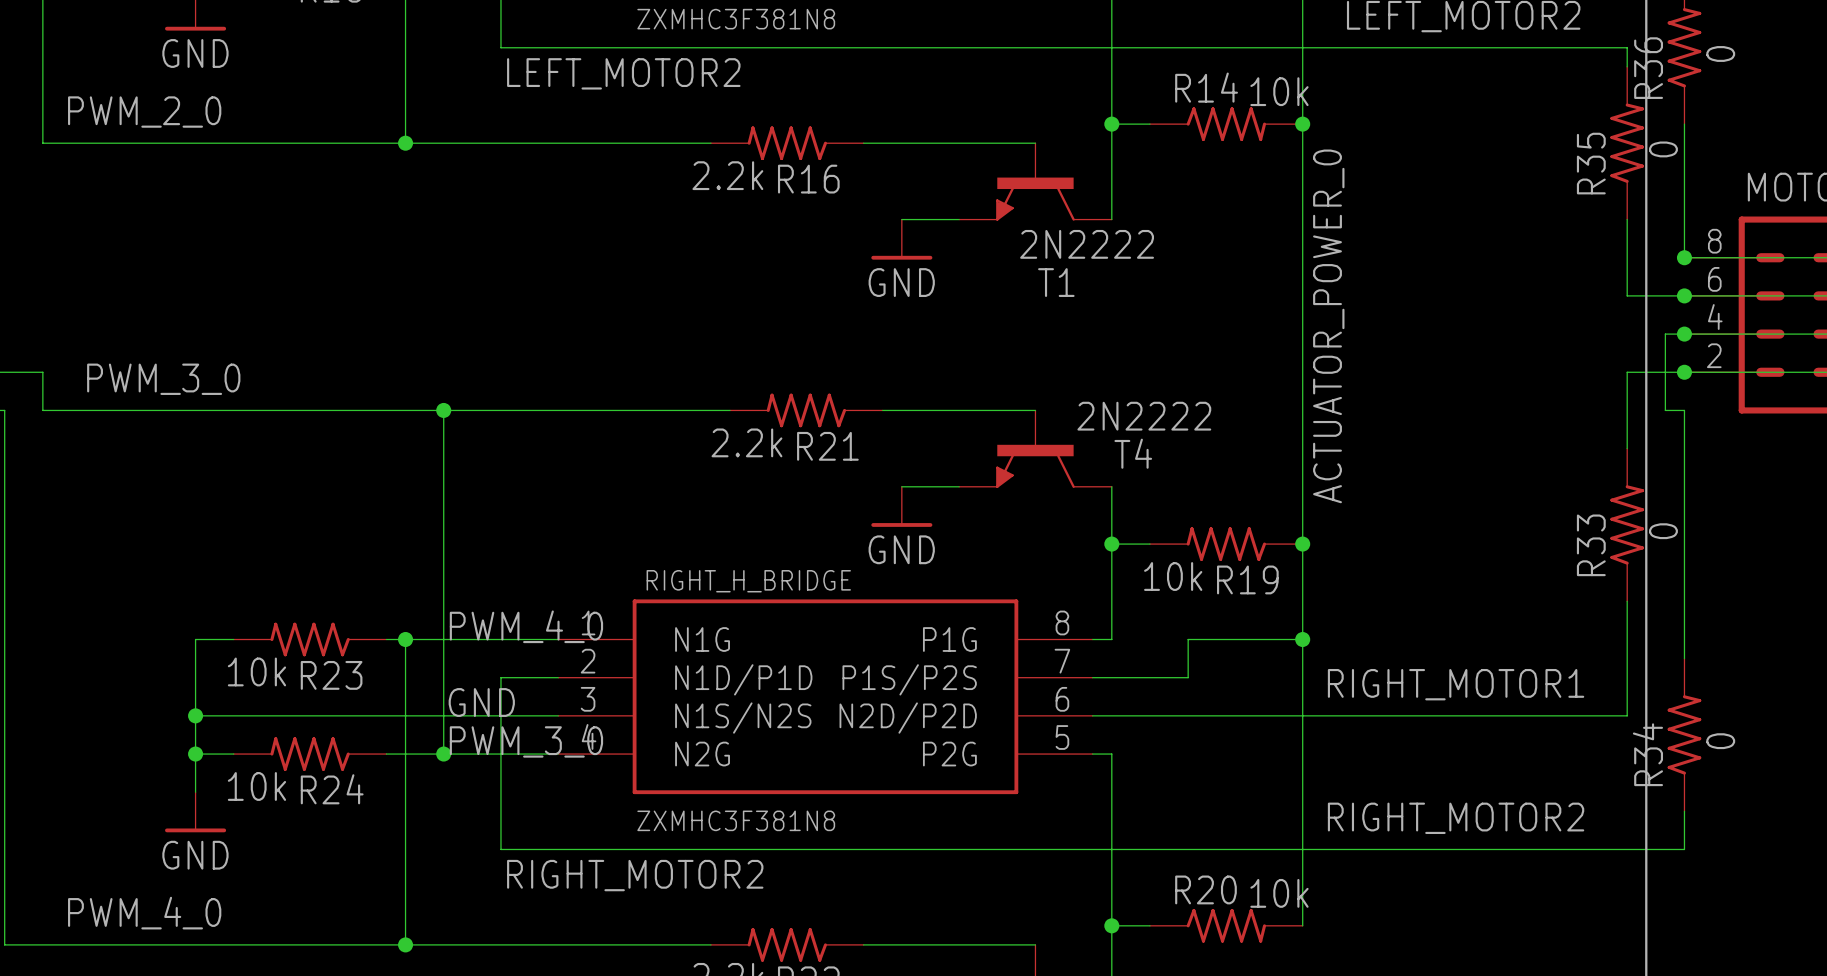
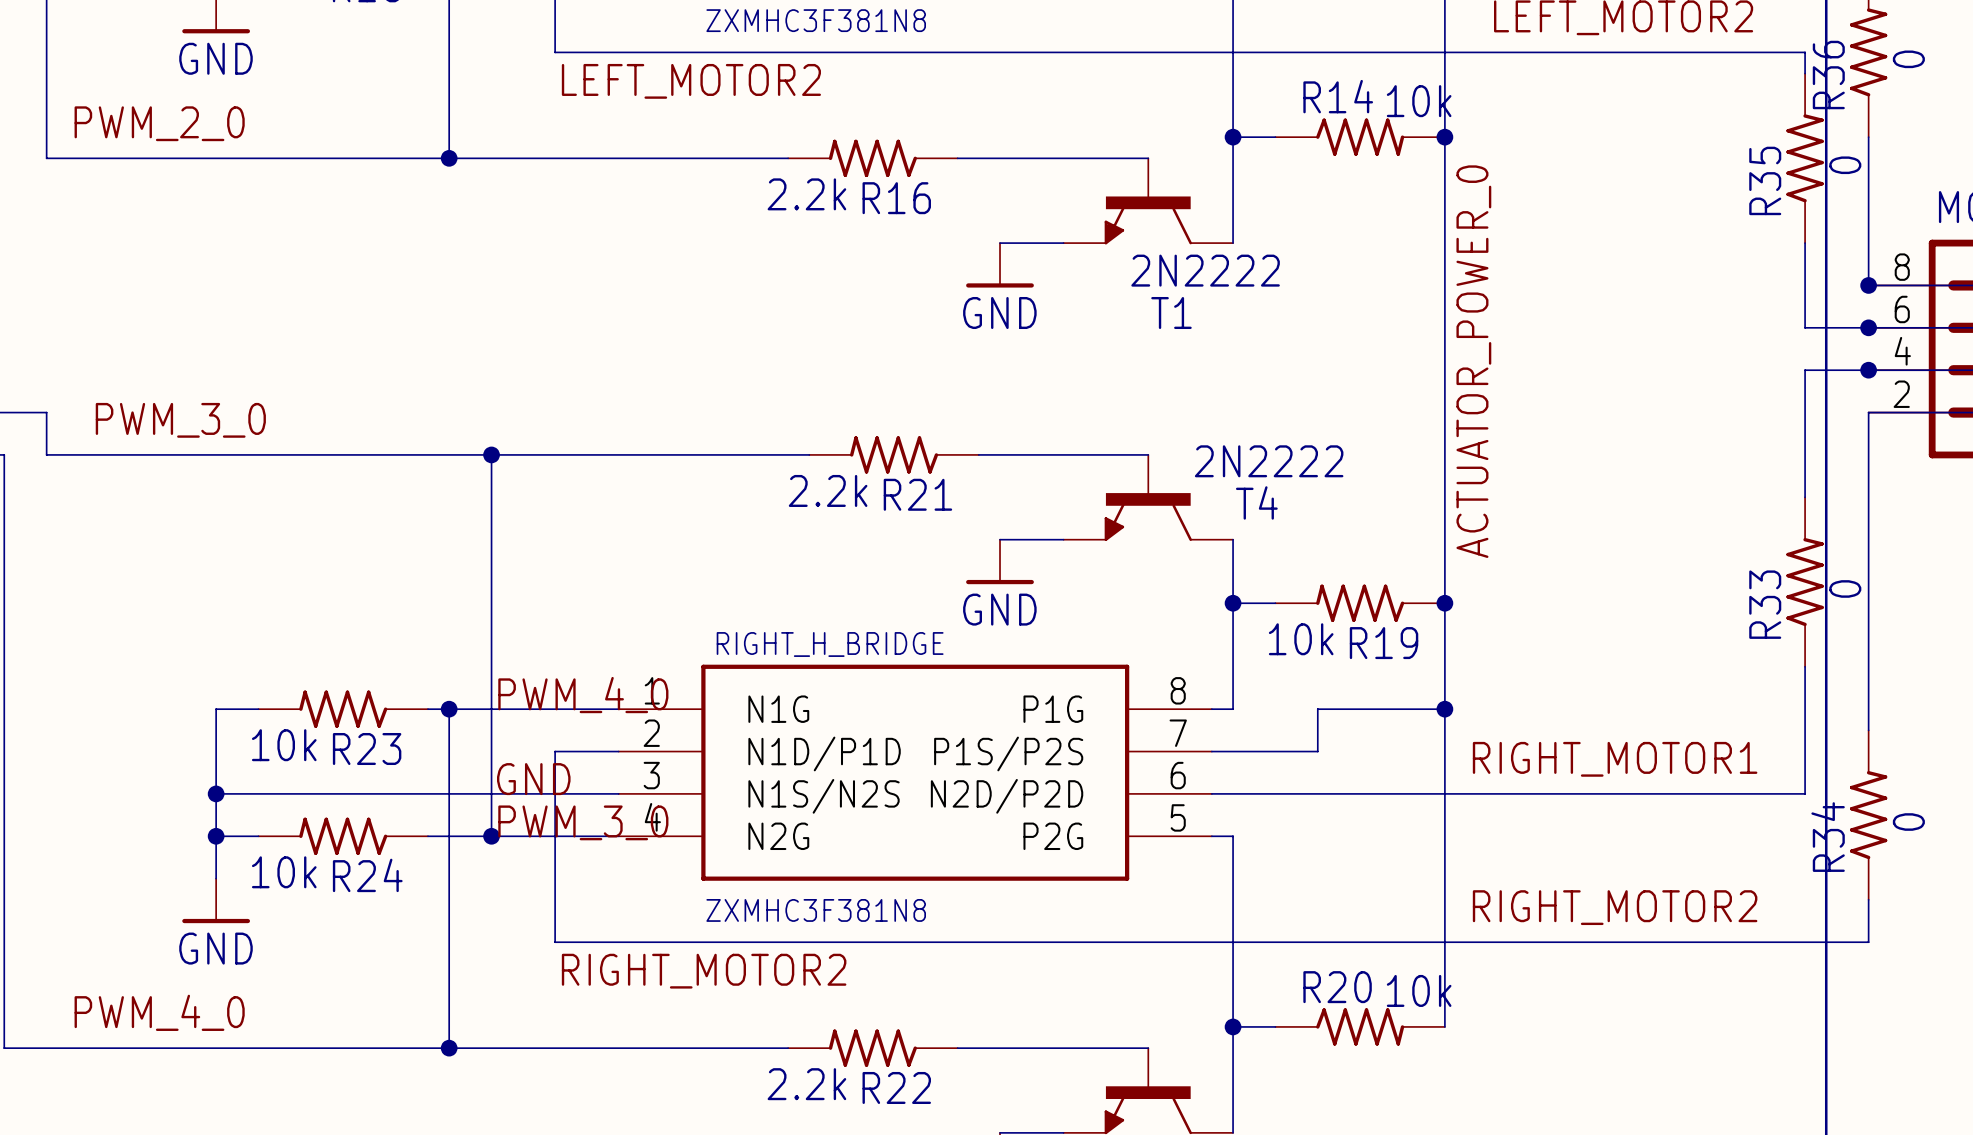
wire: (1665, 334) (1665, 410) (1684, 410) -> (1868, 412) (1868, 454)
wire: (1627, 372) (1684, 372) -> (1805, 412) (1805, 370) (1847, 370)
junction: (1684, 372) -> none

